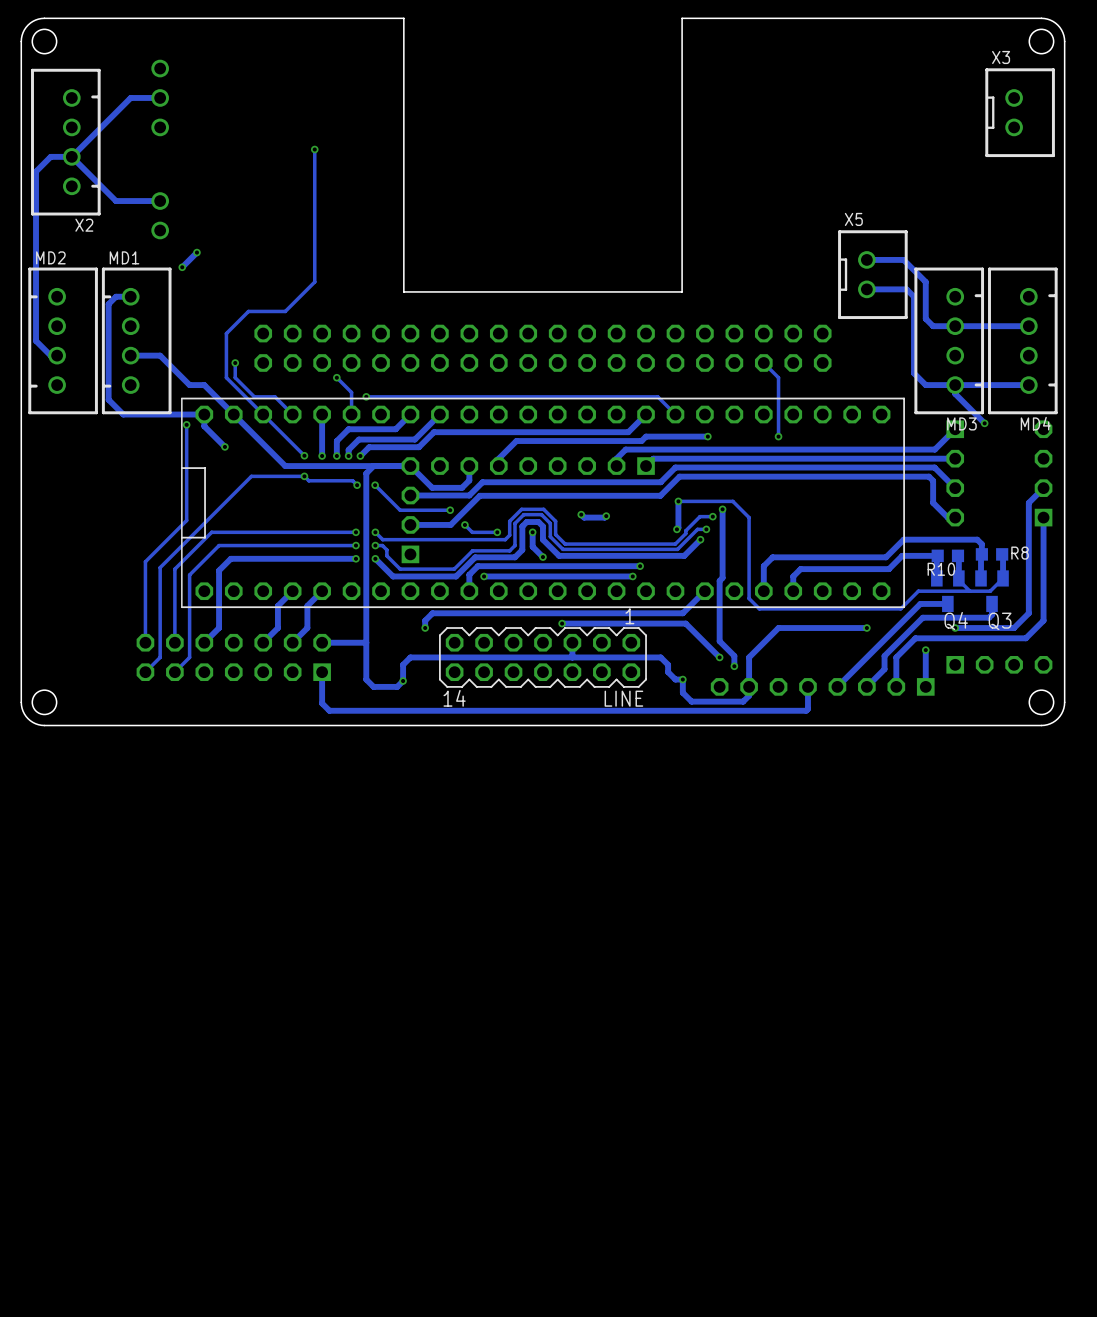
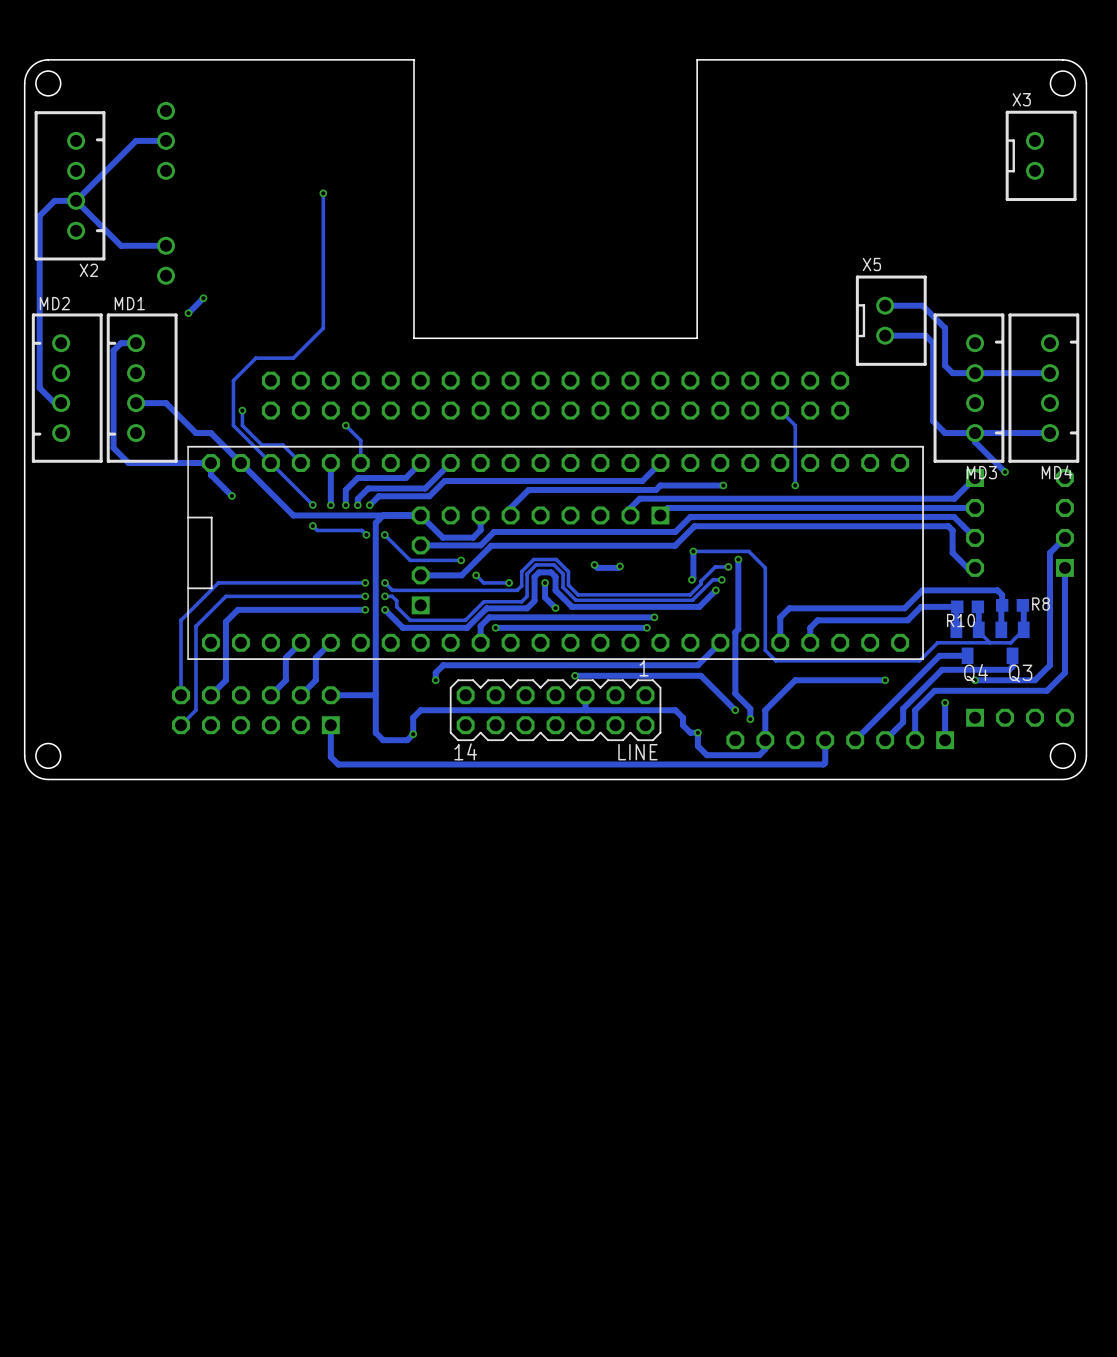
track: (366, 396) (657, 396) (675, 414) -> none
via: (366, 396) -> none
track: (186, 424) (186, 520) (145, 561) (145, 642) -> none
via: (186, 424) -> none
track: (304, 476) (251, 476) (160, 567) (160, 657) (145, 672) -> none
part: (233, 657) -> none

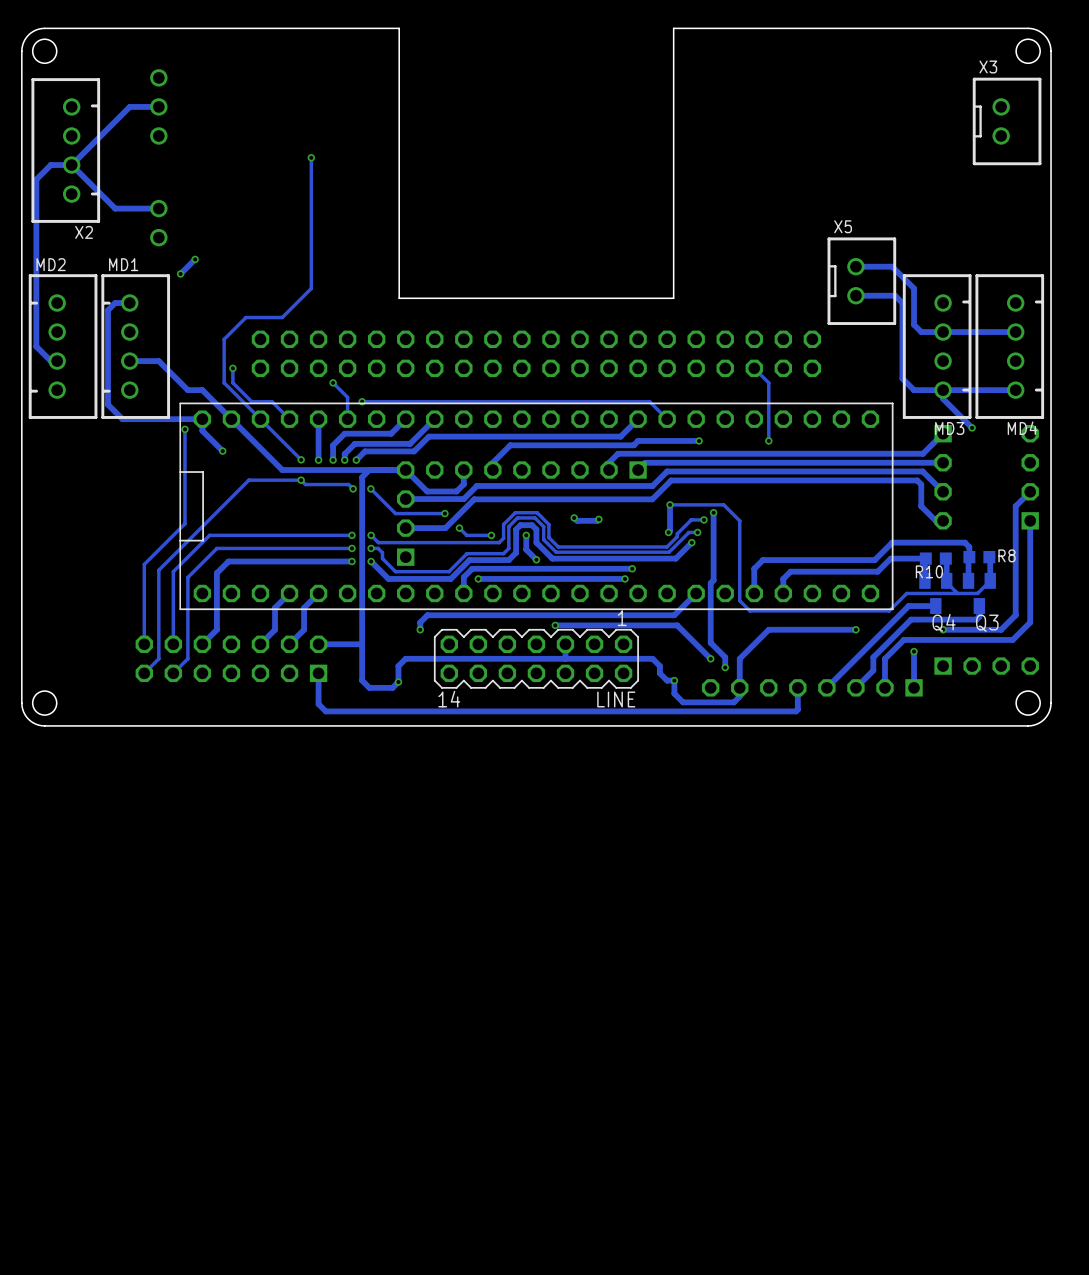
track: none -> (362, 401) (649, 401) (667, 419)
via: none -> (362, 401)
track: none -> (184, 429) (184, 523) (144, 564) (144, 644)
via: none -> (184, 429)
track: none -> (301, 480) (248, 480) (158, 570) (158, 658) (144, 673)
part: none -> (231, 658)

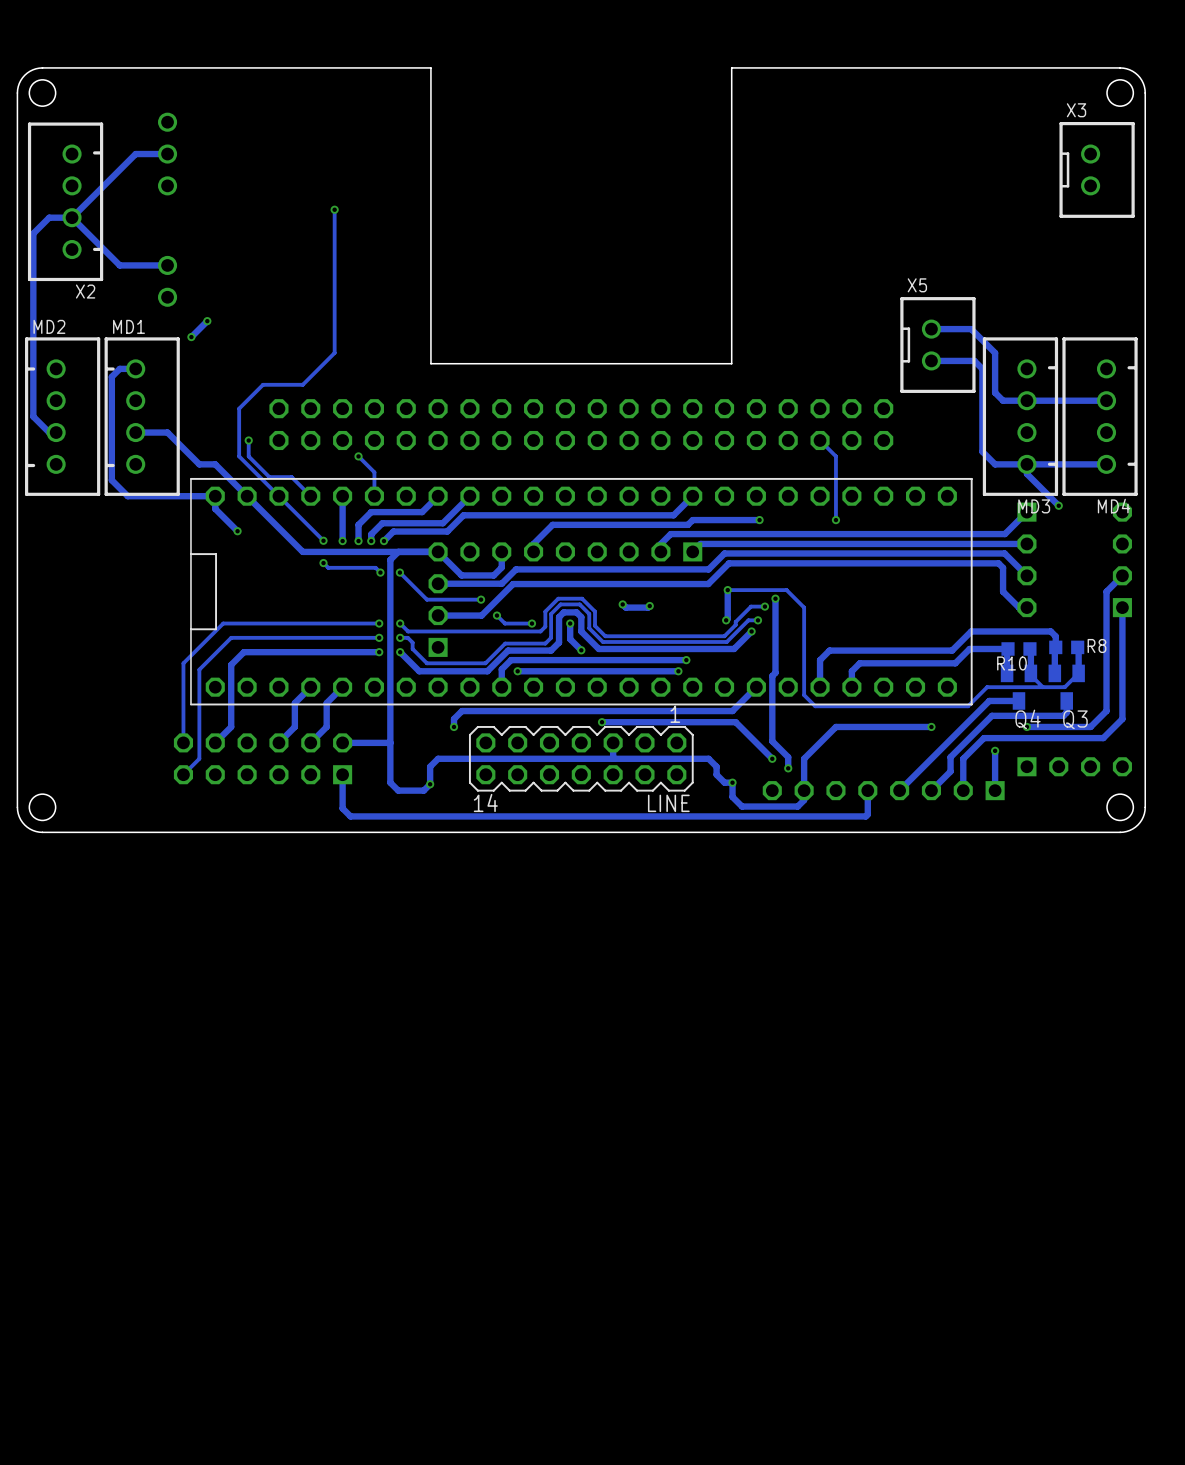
track: (362, 401) (649, 401) (667, 419) -> none
via: (362, 401) -> none
track: (184, 429) (184, 523) (144, 564) (144, 644) -> none
via: (184, 429) -> none
track: (301, 480) (248, 480) (158, 570) (158, 658) (144, 673) -> none
part: (231, 658) -> none

